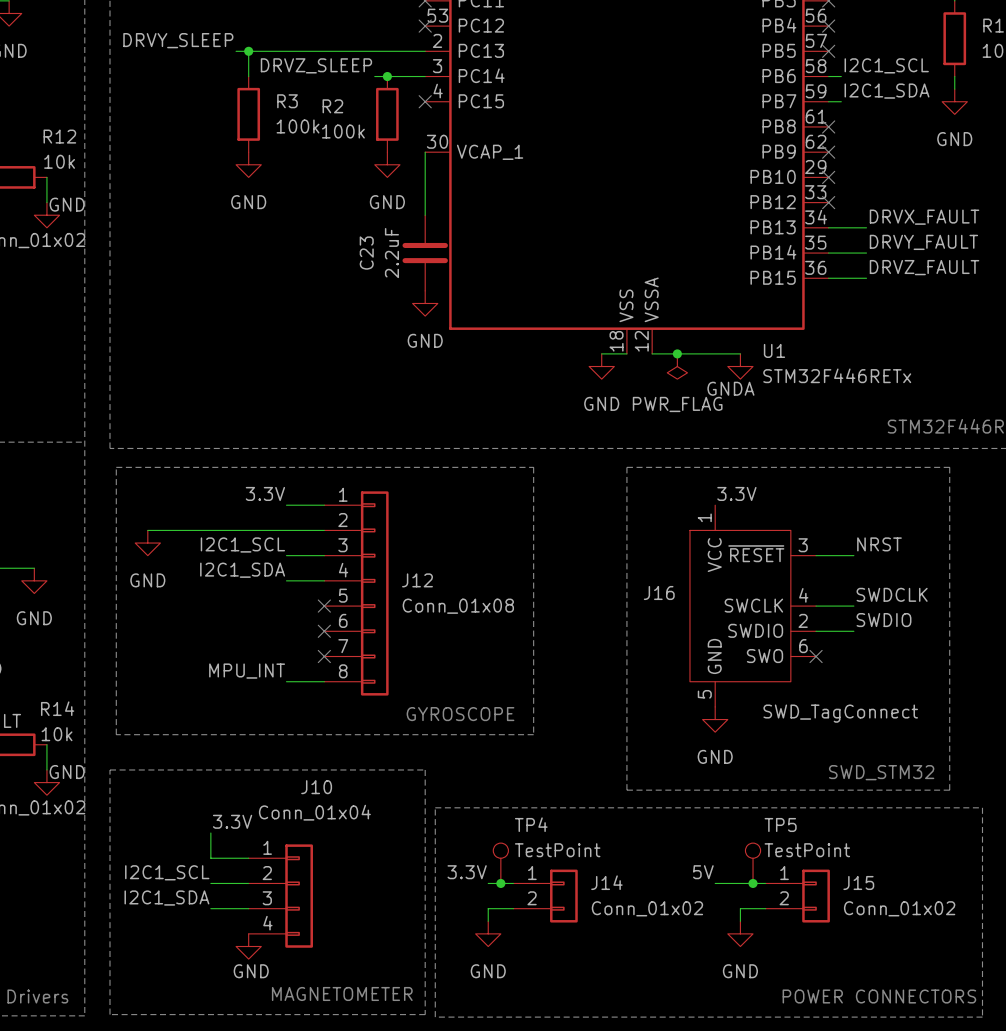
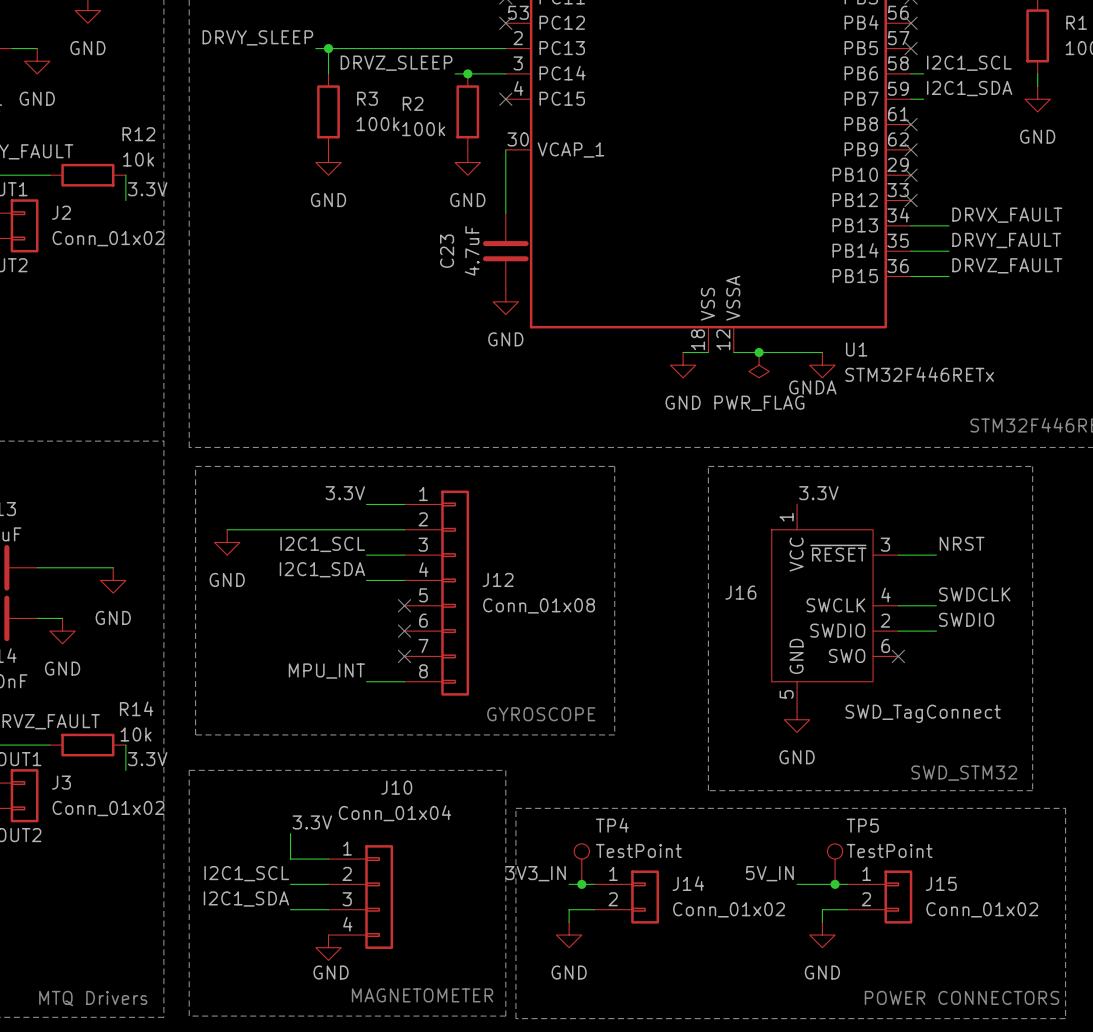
label: none -> 3.3V (147, 189)
power symbol: GND (46, 215) -> none
C23 value: 2.2uF (391, 253) -> 4.7uF (472, 250)
label: none -> 3.3V (147, 759)
power symbol: GND (46, 782) -> none
label: 3.3V (467, 872) -> 3V3_IN (535, 873)
label: 5V (703, 872) -> 5V_IN (769, 873)

